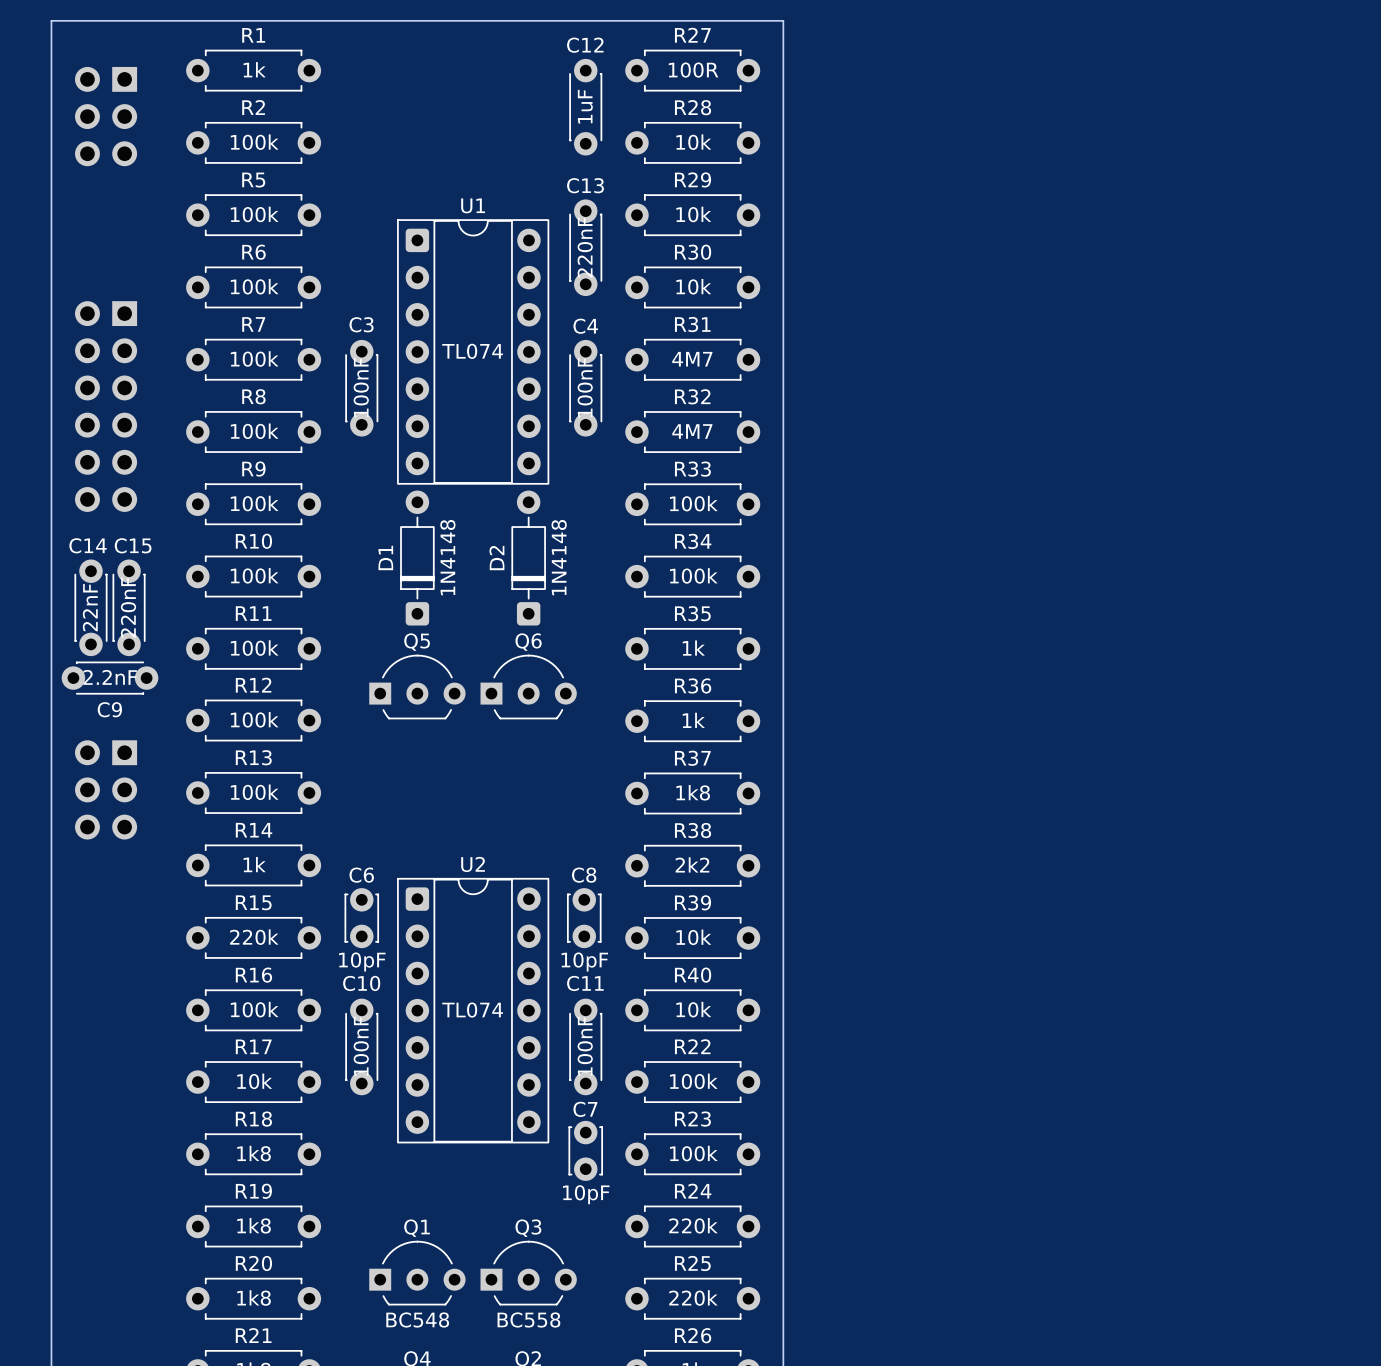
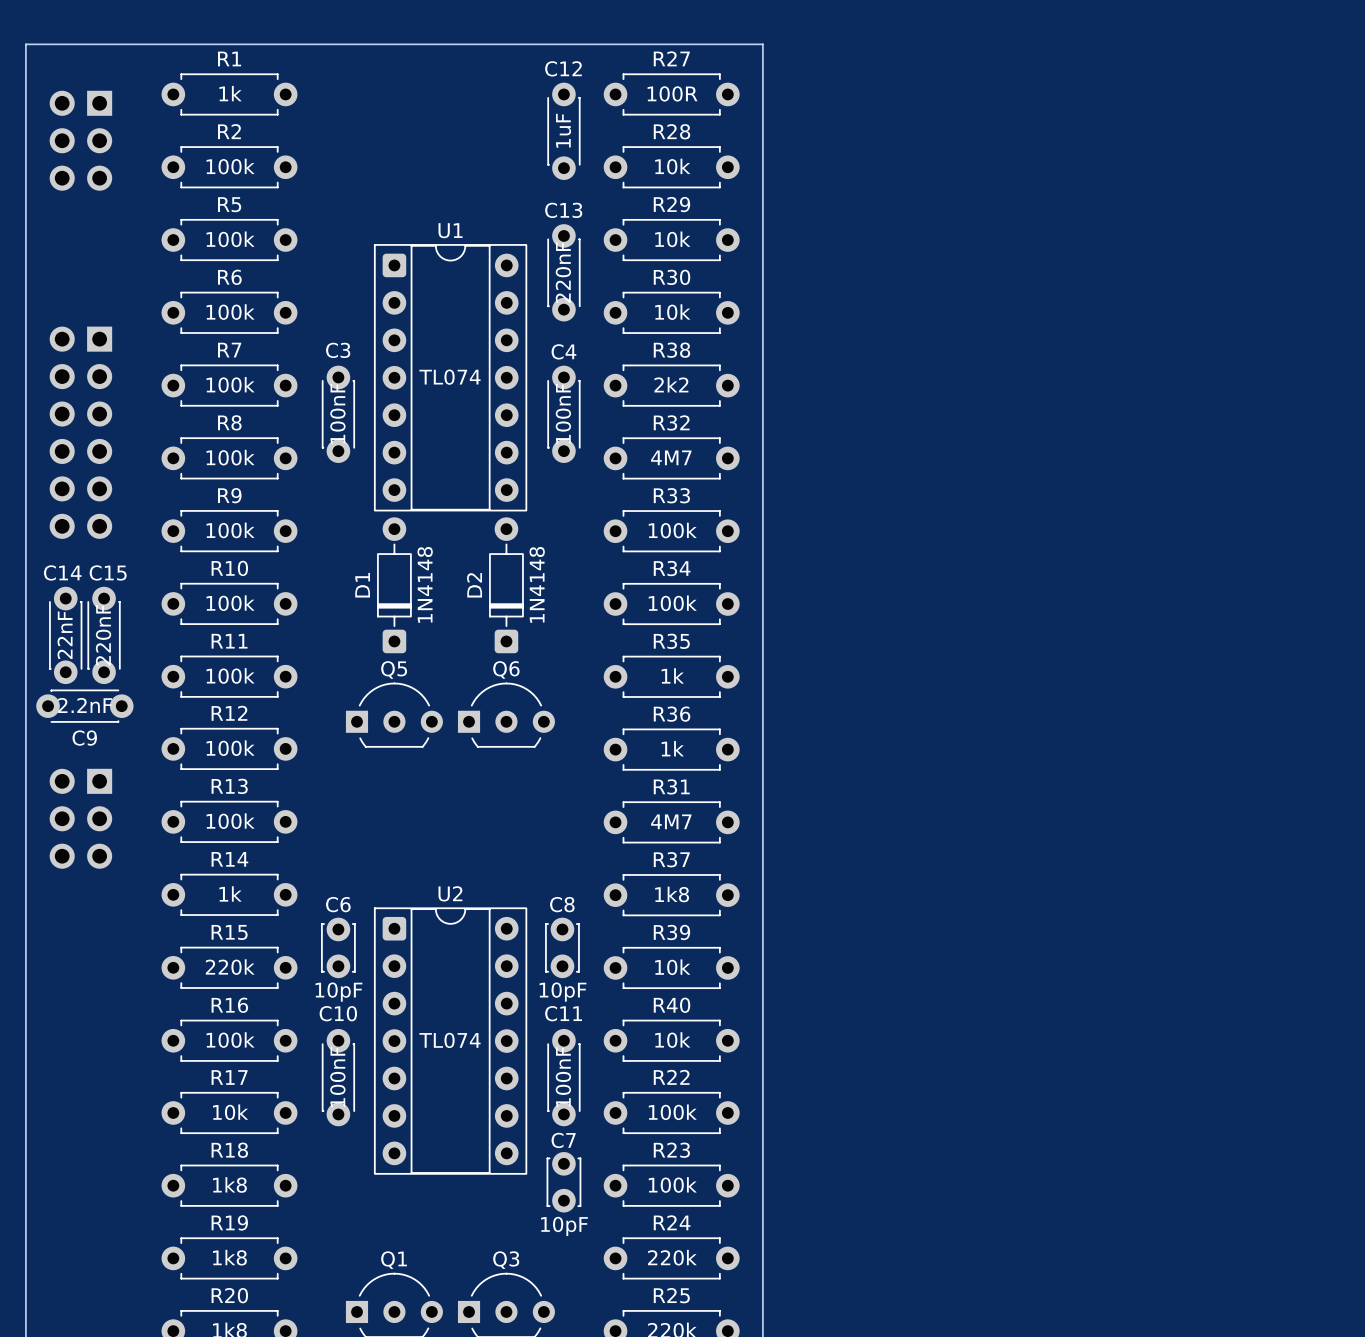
R31 name: R31 (692, 324) -> R38 (671, 350)
R31 value: 4M7 (692, 359) -> 2k2 (671, 384)
R37 name: R37 (692, 758) -> R31 (671, 786)
R37 value: 1k8 (693, 792) -> 4M7 (671, 821)
R38 name: R38 (693, 830) -> R37 (671, 859)
R38 value: 2k2 (692, 864) -> 1k8 (672, 894)

